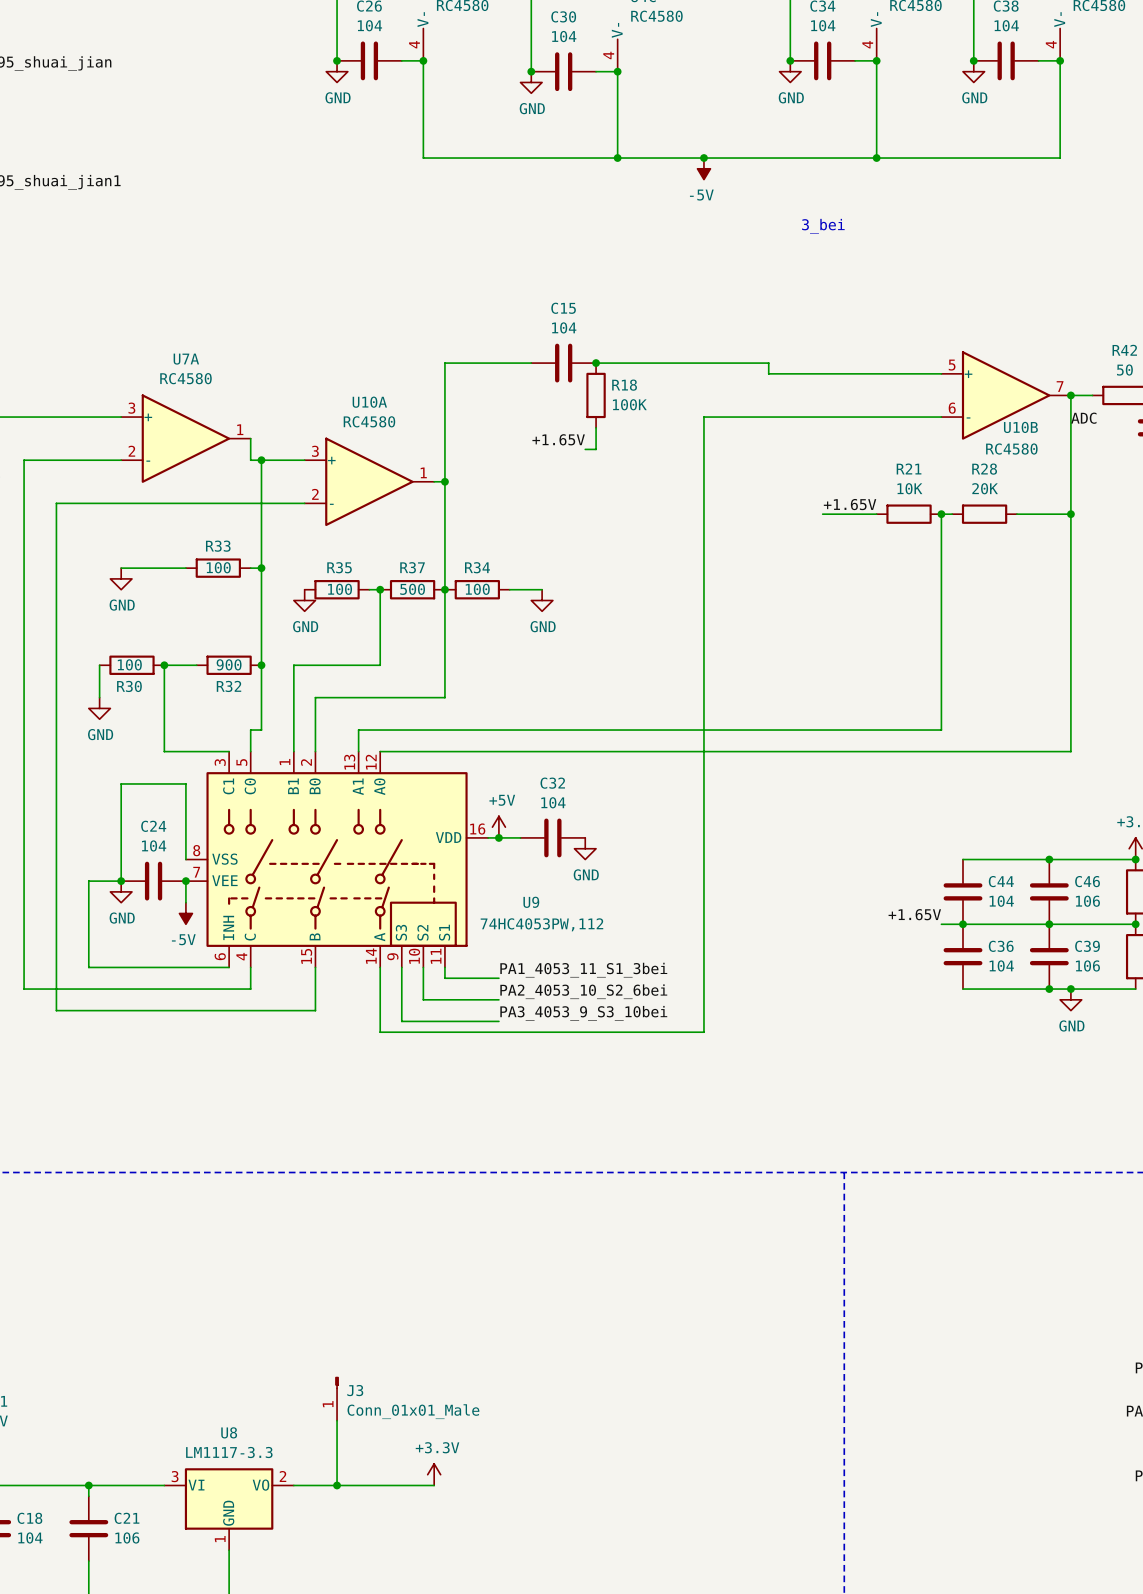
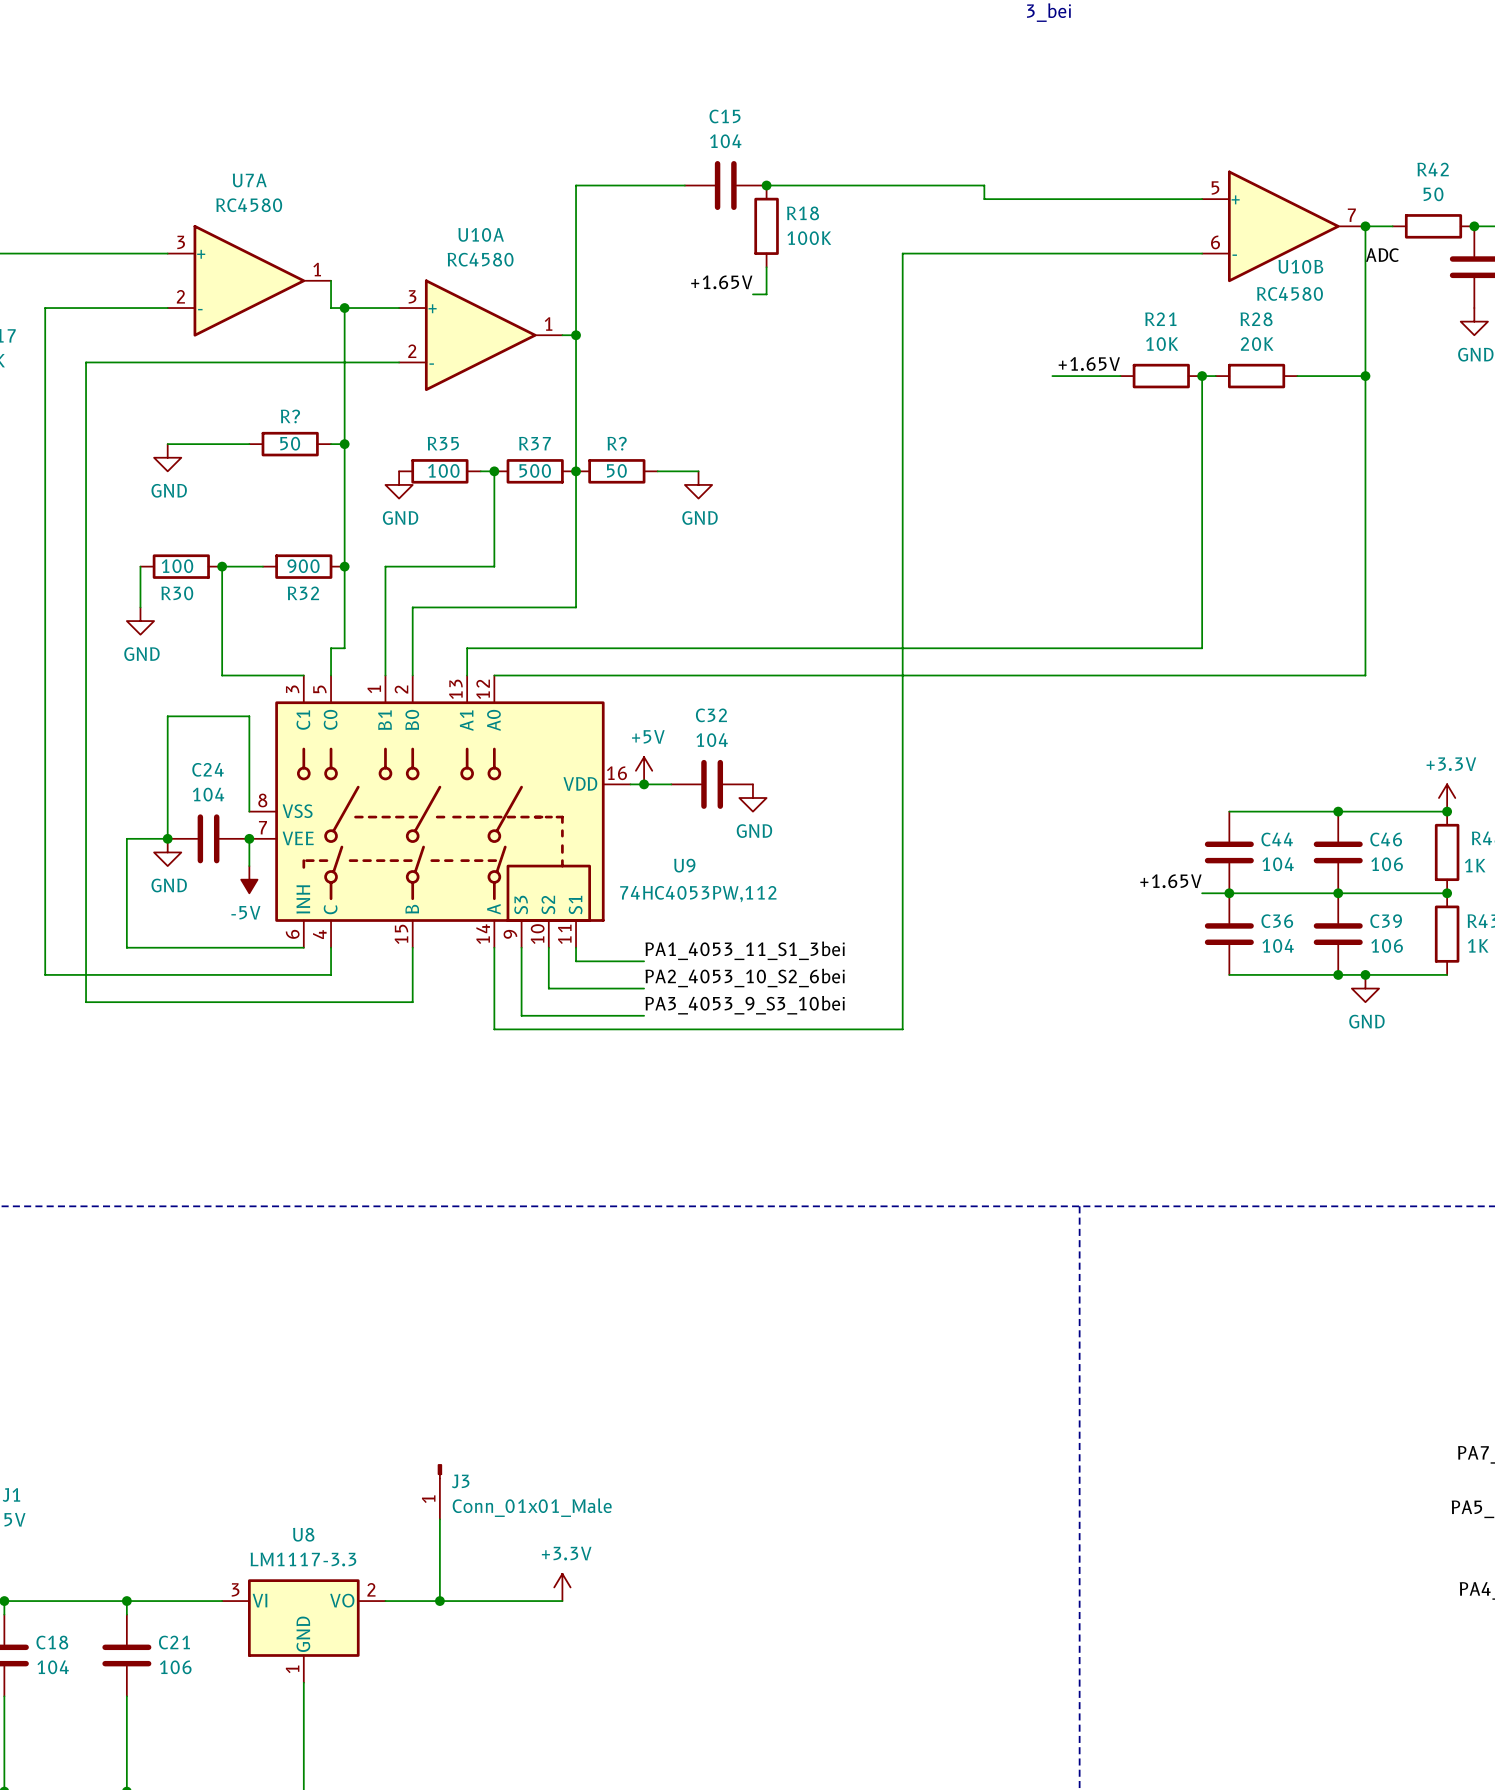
R33 name: R33 (218, 546) -> R? (290, 416)
R33 value: 100 (218, 567) -> 50 (290, 443)
R34 name: R34 (477, 567) -> R? (617, 443)
R34 value: 100 (477, 589) -> 50 (616, 470)

